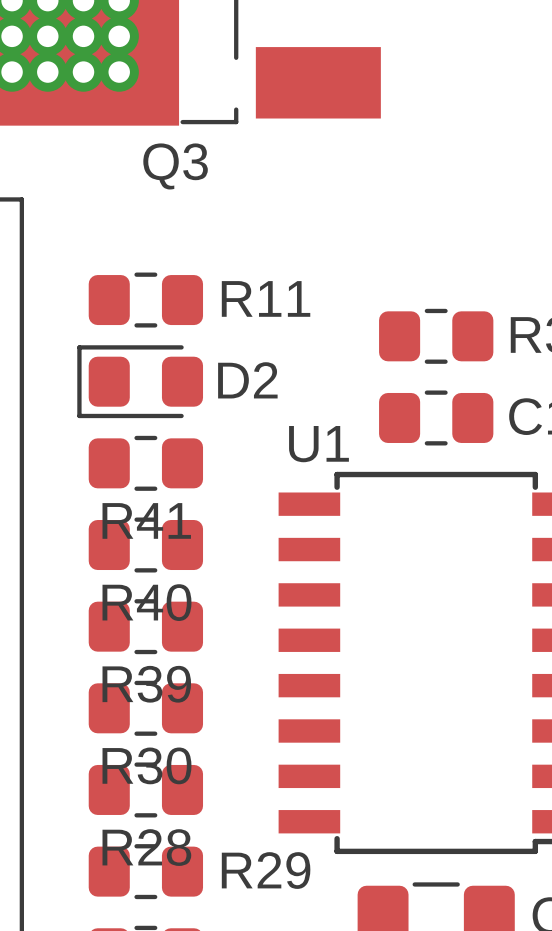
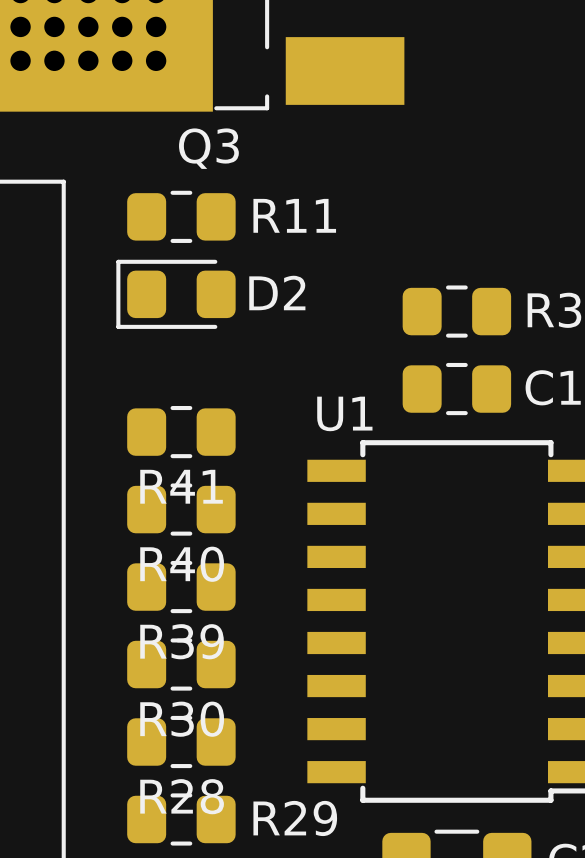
R11 position: (145, 300) -> (181, 216)
D2 position: (140, 381) -> (175, 294)

